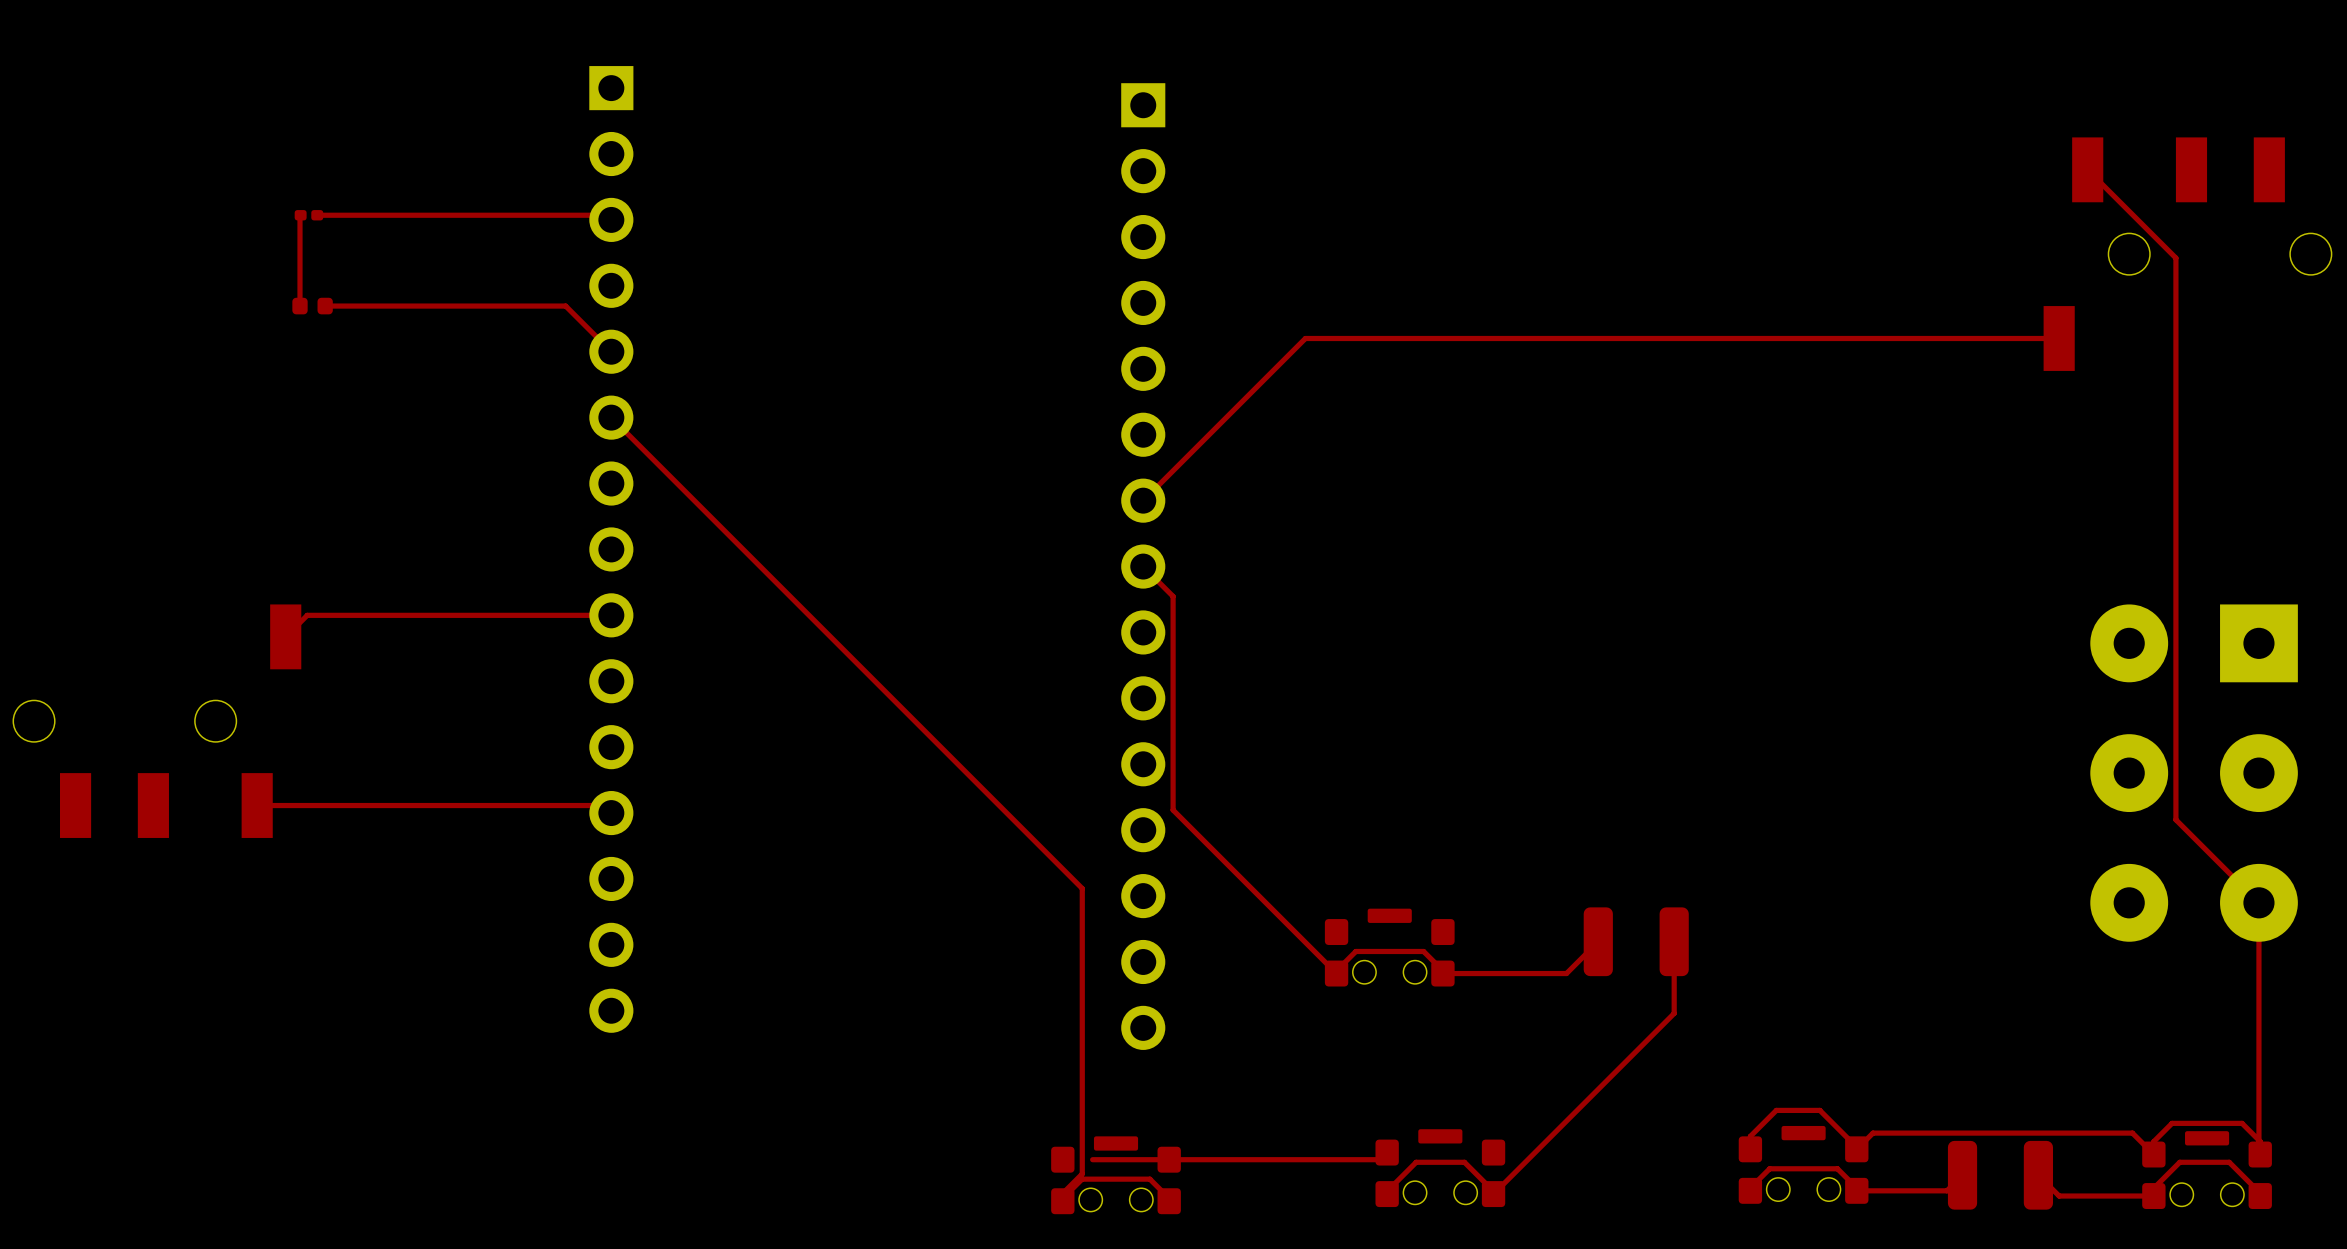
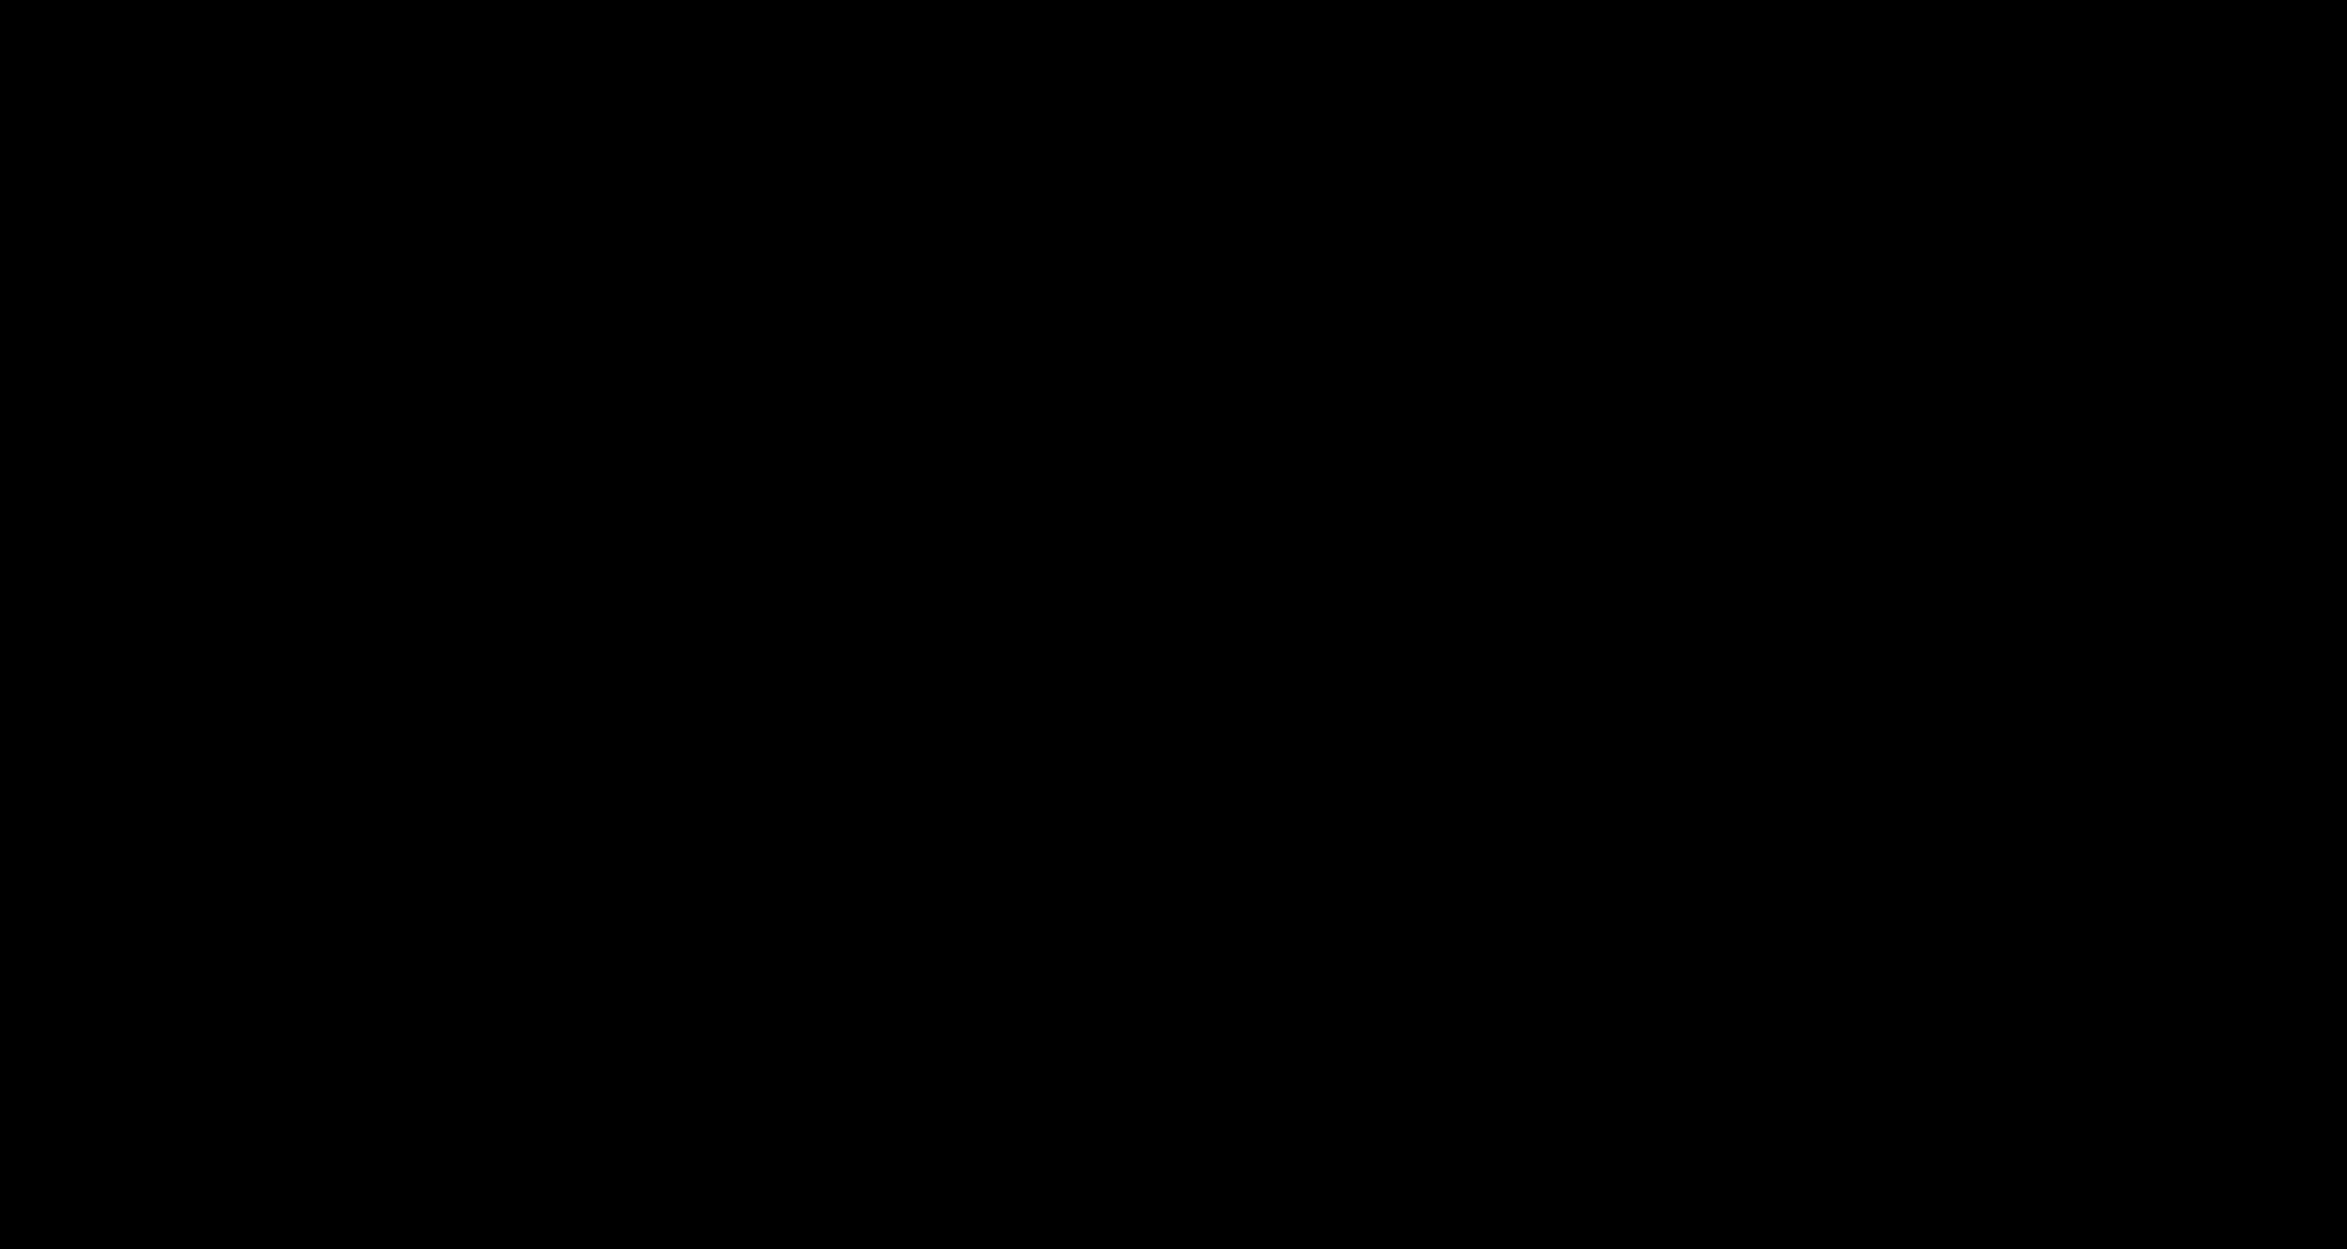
top track: (2087, 169) (2175, 258) (2175, 819) (2258, 902) (2258, 1153) (2260, 1154) (2260, 1141) (2242, 1123) (2172, 1123) (2153, 1141) (2153, 1154) (2132, 1133) (1873, 1133) (1856, 1149) (1819, 1110) (1776, 1110) (1750, 1136) (1750, 1149) -> none
top track: (300, 215) (300, 306) -> none
part: (308, 215) -> none
top track: (317, 215) (606, 215) (611, 219) -> none
part: (2187, 254) -> none
part: (312, 306) -> none
top track: (325, 306) (565, 306) (611, 351) -> none
top track: (2059, 338) (1305, 338) (1143, 500) -> none
top track: (611, 417) (1082, 888) (1082, 1173) (1062, 1193) (1062, 1201) -> none
part: (611, 549) -> none
top track: (1143, 566) (1173, 596) (1173, 810) (1336, 973) (1336, 970) (1355, 951) (1423, 951) (1442, 970) (1442, 973) (1566, 973) (1598, 941) -> none
part: (1143, 566) -> none
top track: (611, 615) (307, 615) (285, 636) -> none
part: (157, 721) -> none
part: (2194, 773) -> none
top track: (257, 805) (603, 805) (611, 813) -> none
part: (1636, 941) -> none
top track: (1674, 941) (1674, 1013) (1493, 1194) (1493, 1191) (1464, 1162) (1416, 1162) (1387, 1191) (1387, 1194) -> none
part: (1389, 947) -> none
top track: (1387, 1152) (1380, 1159) (1092, 1159) -> none
part: (1803, 1164) -> none
part: (1440, 1168) -> none
part: (2207, 1170) -> none
part: (1116, 1175) -> none
top track: (1962, 1175) (1946, 1190) (1856, 1190) (1856, 1188) (1837, 1168) (1769, 1168) (1750, 1188) (1750, 1190) -> none
part: (2000, 1175) -> none
top track: (2038, 1175) (2059, 1196) (2153, 1196) (2153, 1188) (2179, 1162) (2229, 1162) (2260, 1193) (2260, 1196) -> none
top track: (1062, 1198) (1082, 1179) (1149, 1179) (1169, 1198) (1169, 1201) -> none

